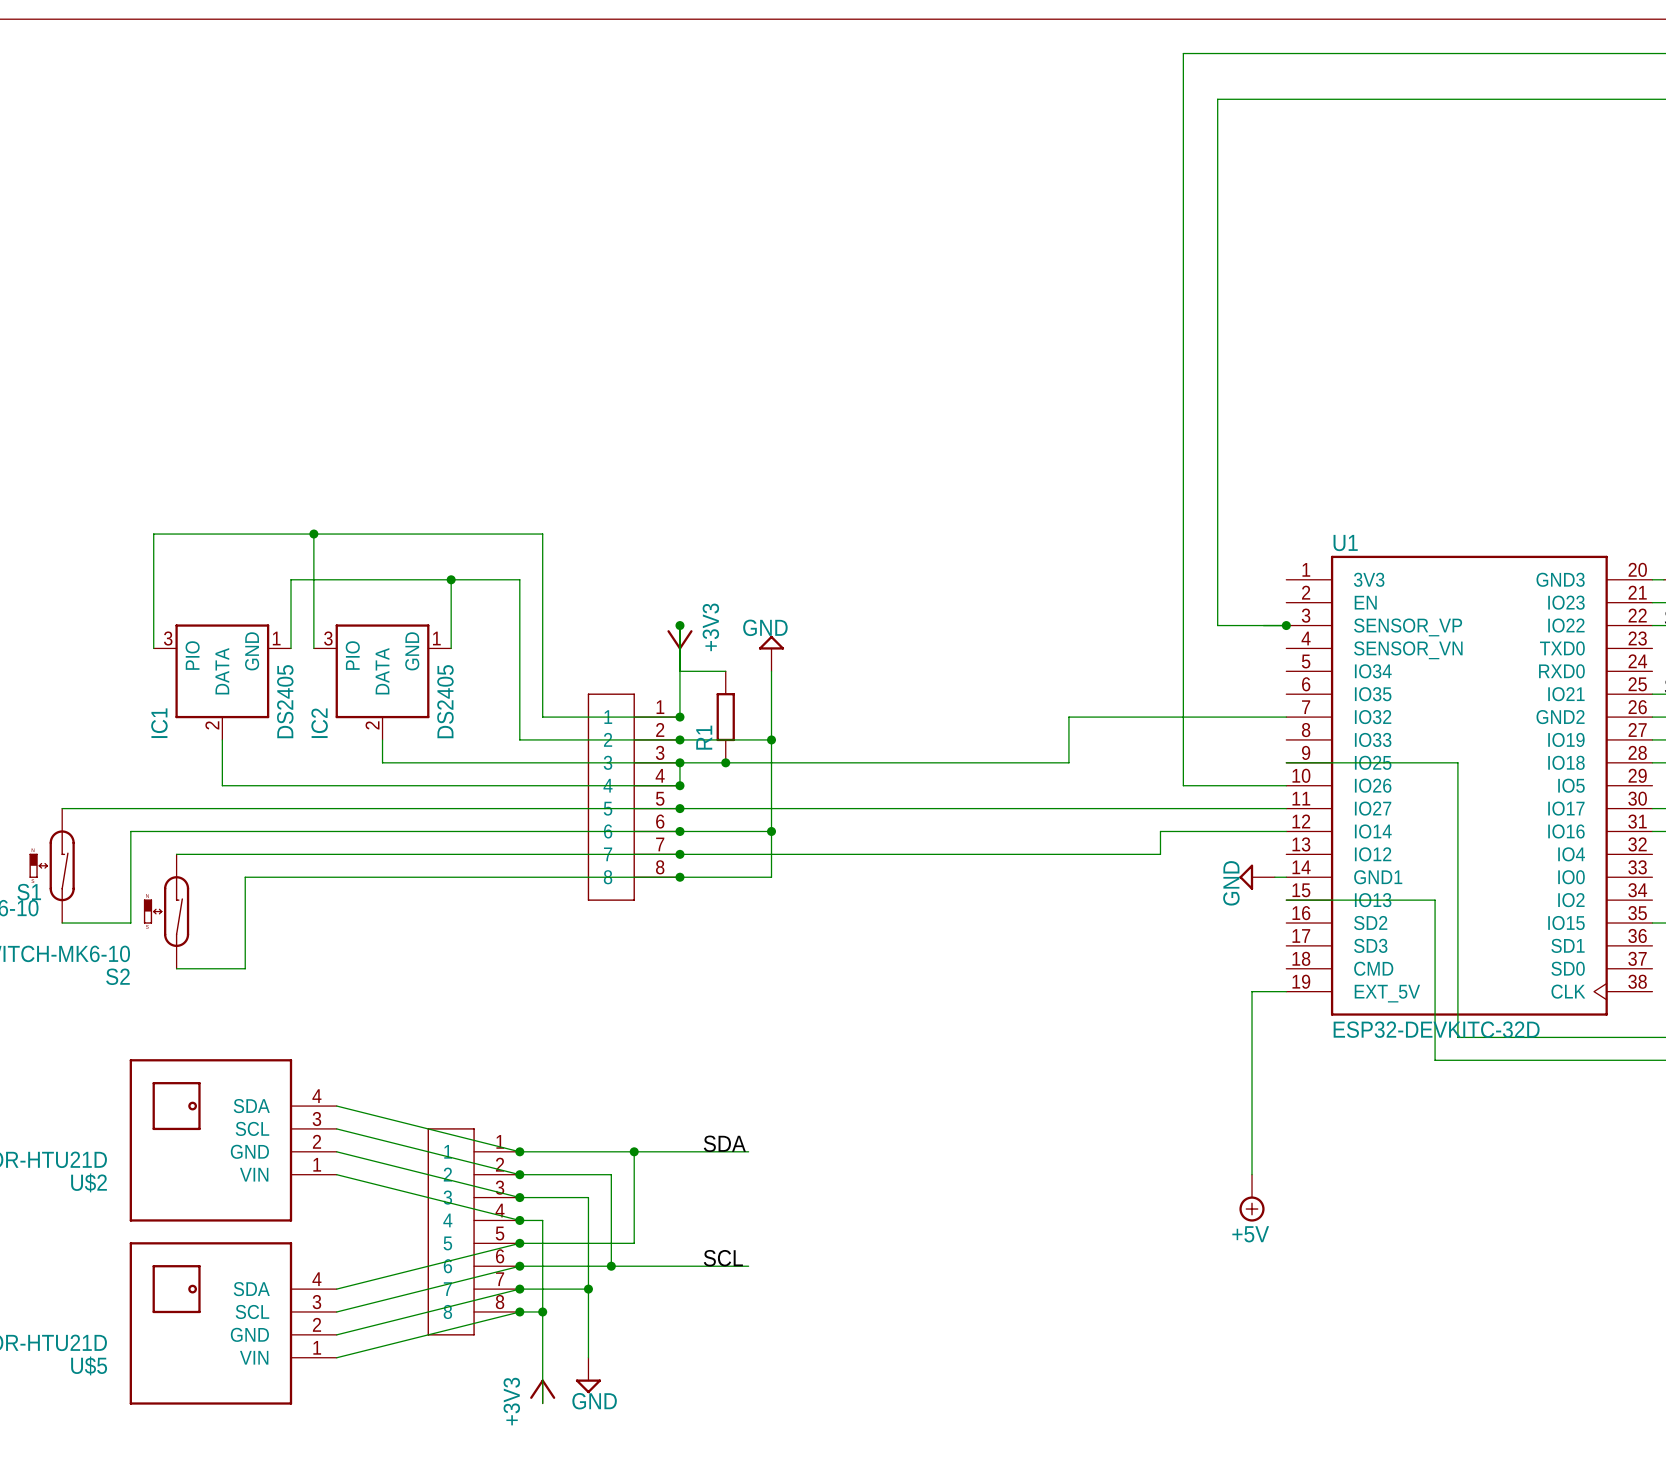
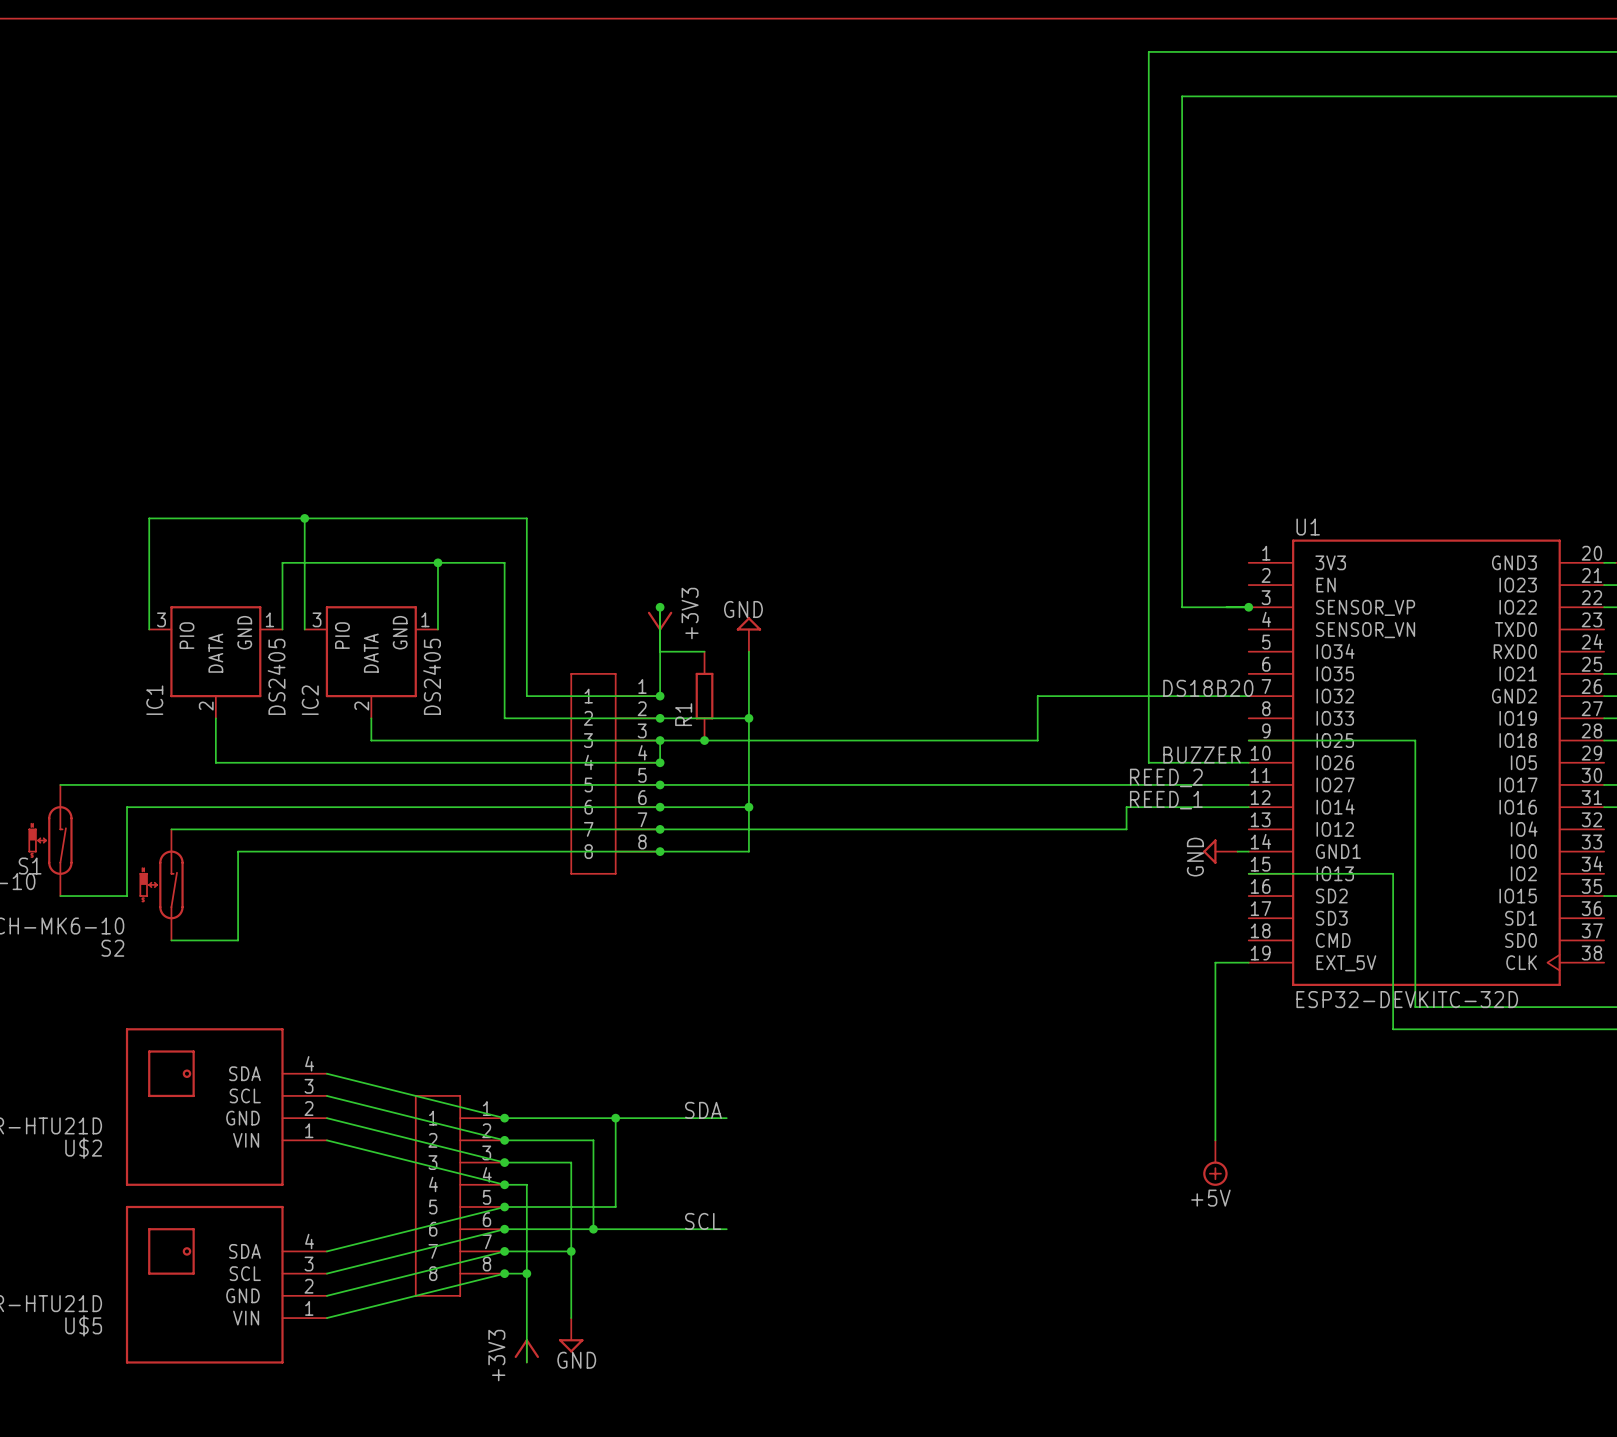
label: none -> DS18B20 (1208, 688)
label: none -> BUZZER (1202, 754)
label: none -> REED_2 (1166, 777)
label: none -> REED_1 (1166, 800)

